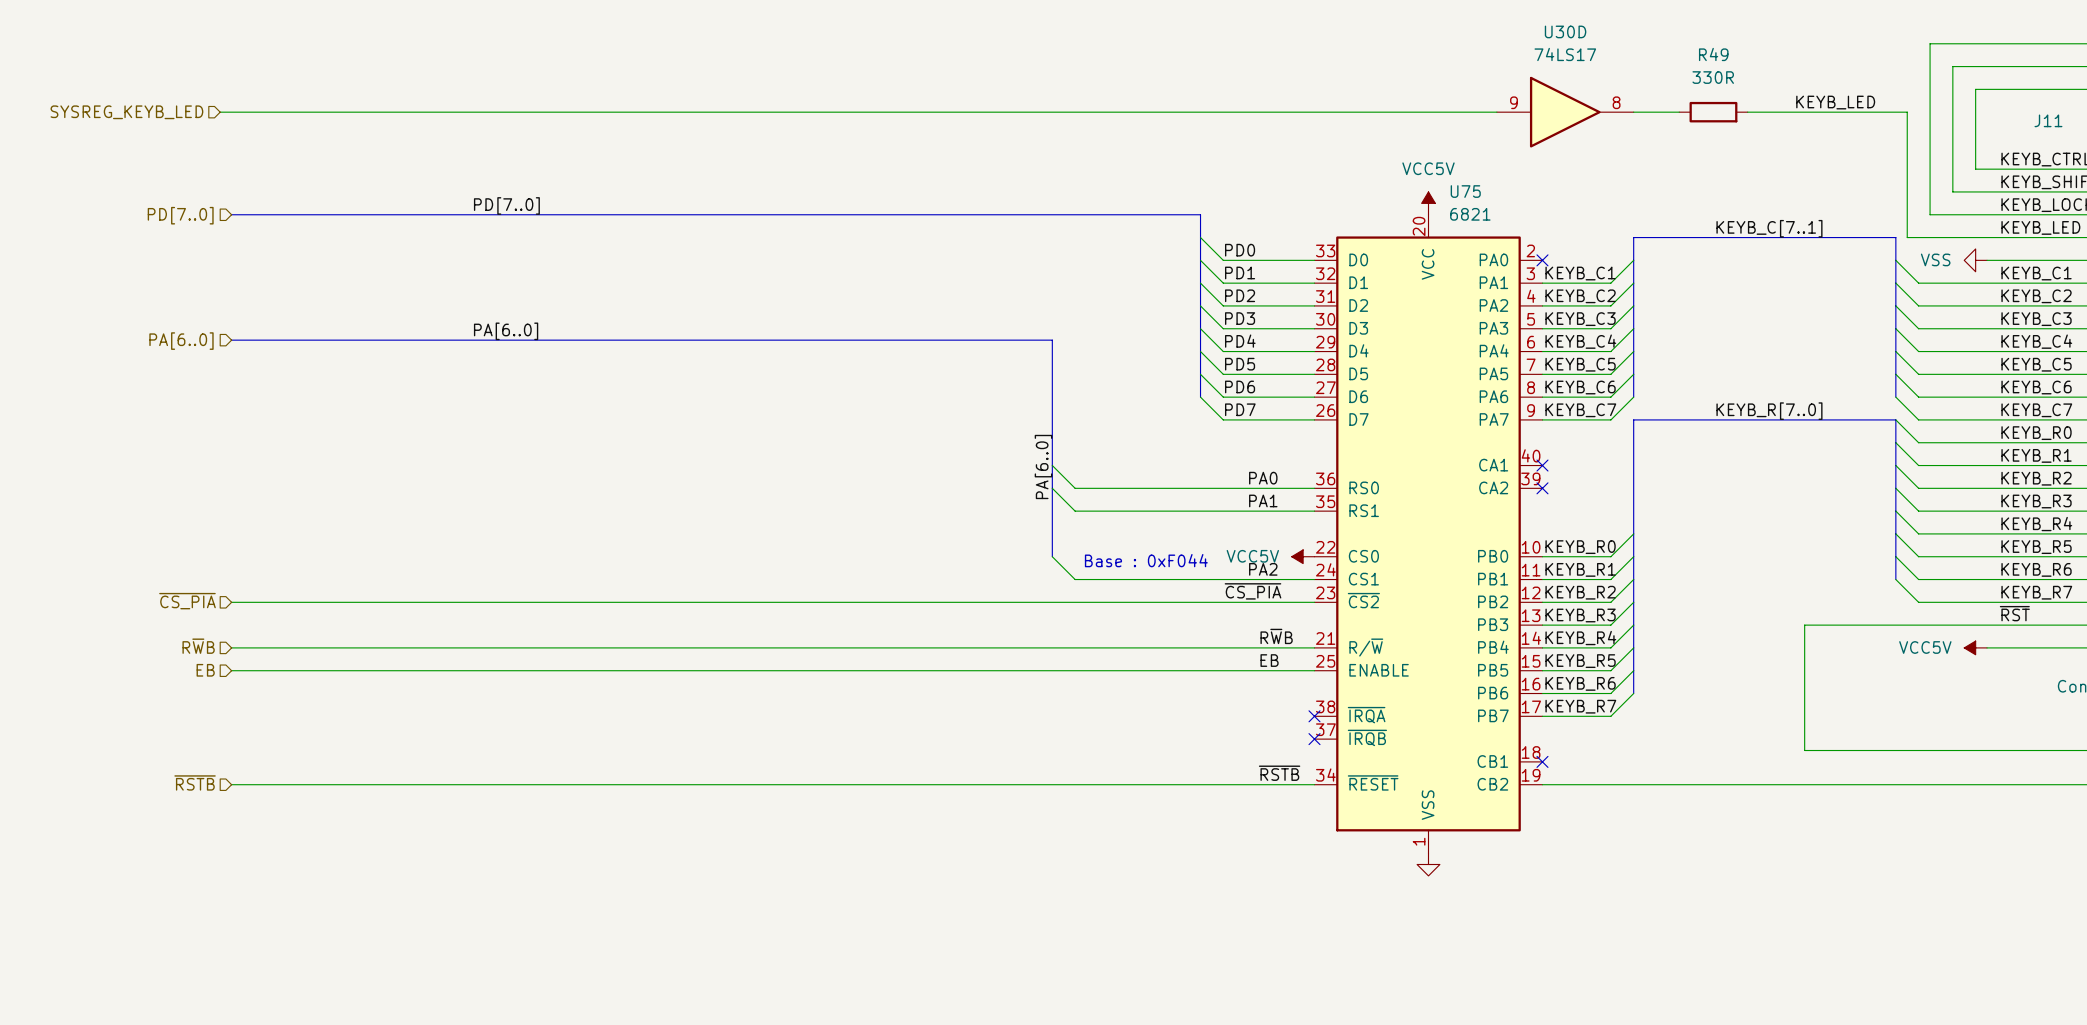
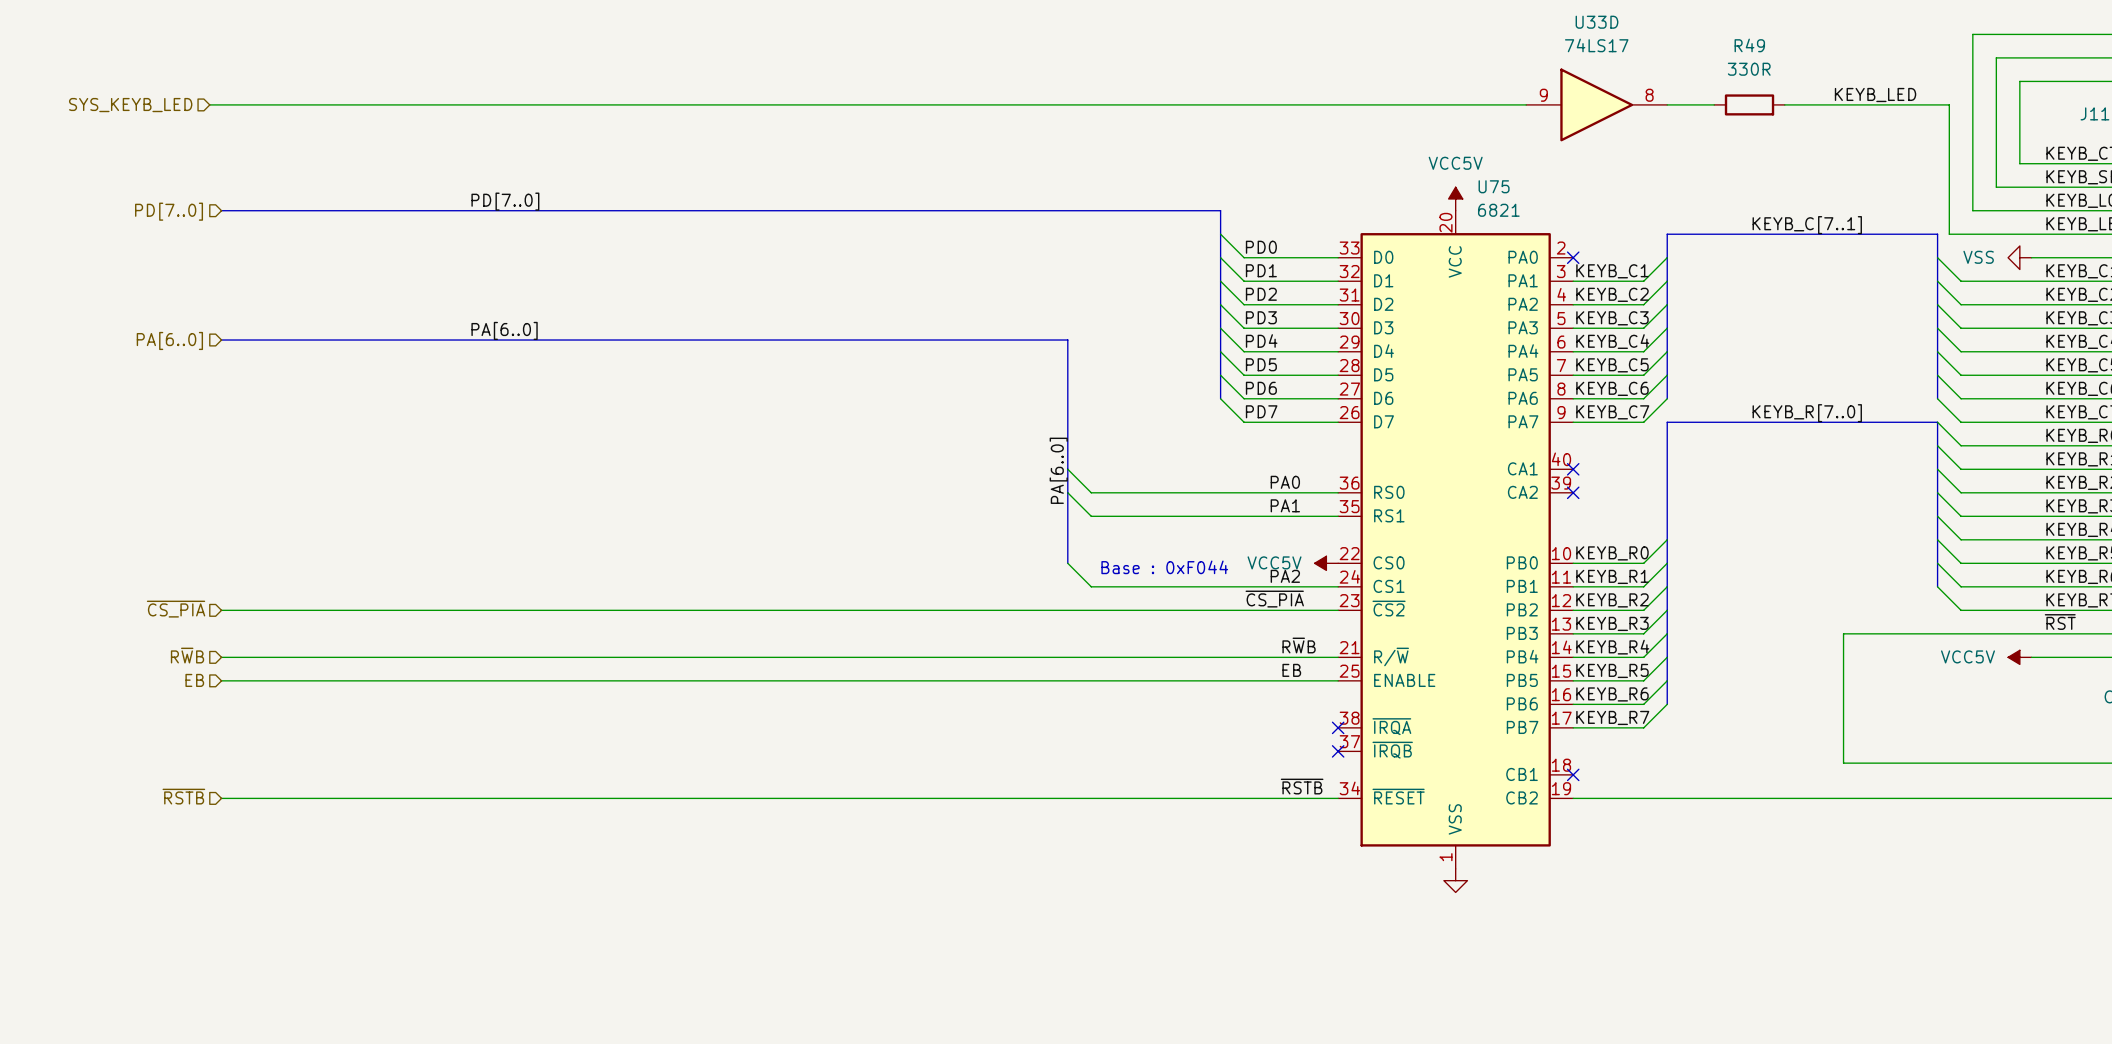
U30D name: U30D (1565, 31) -> U33D (1597, 22)
hierarchical label: SYSREG_KEYB_LED (126, 112) -> SYS_KEYB_LED (130, 105)

